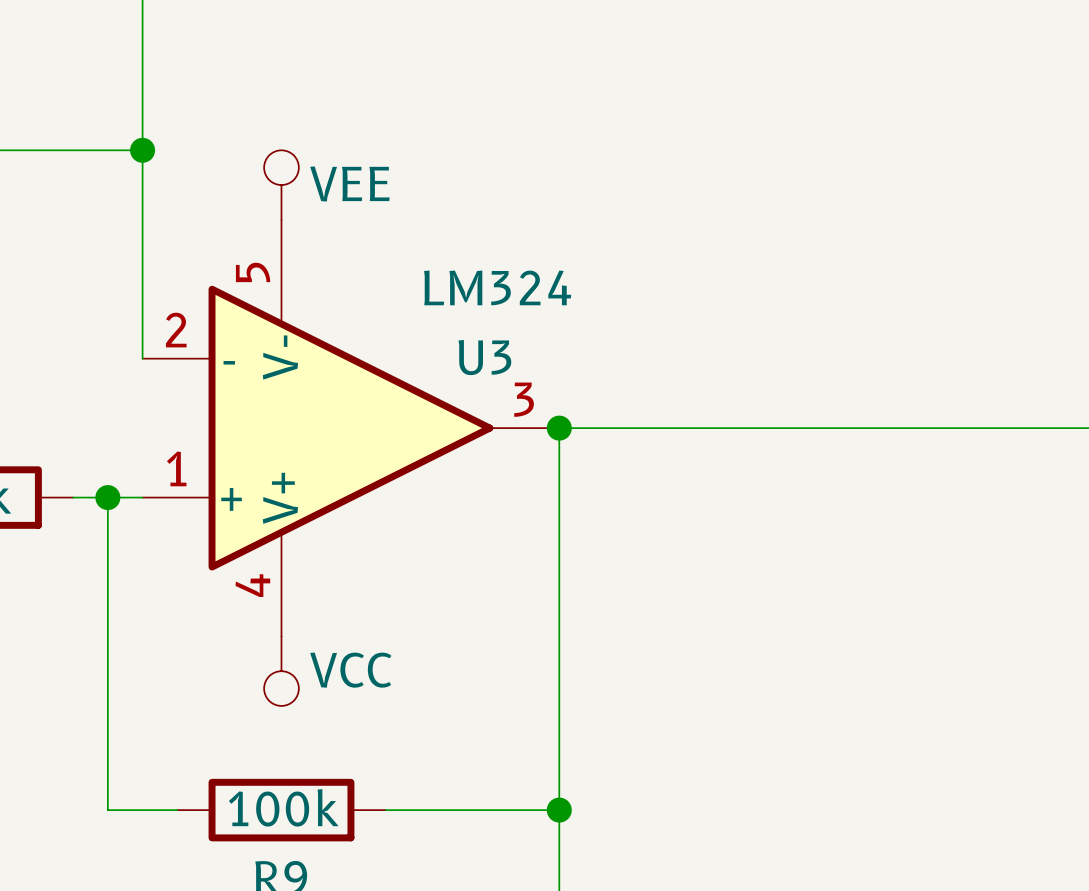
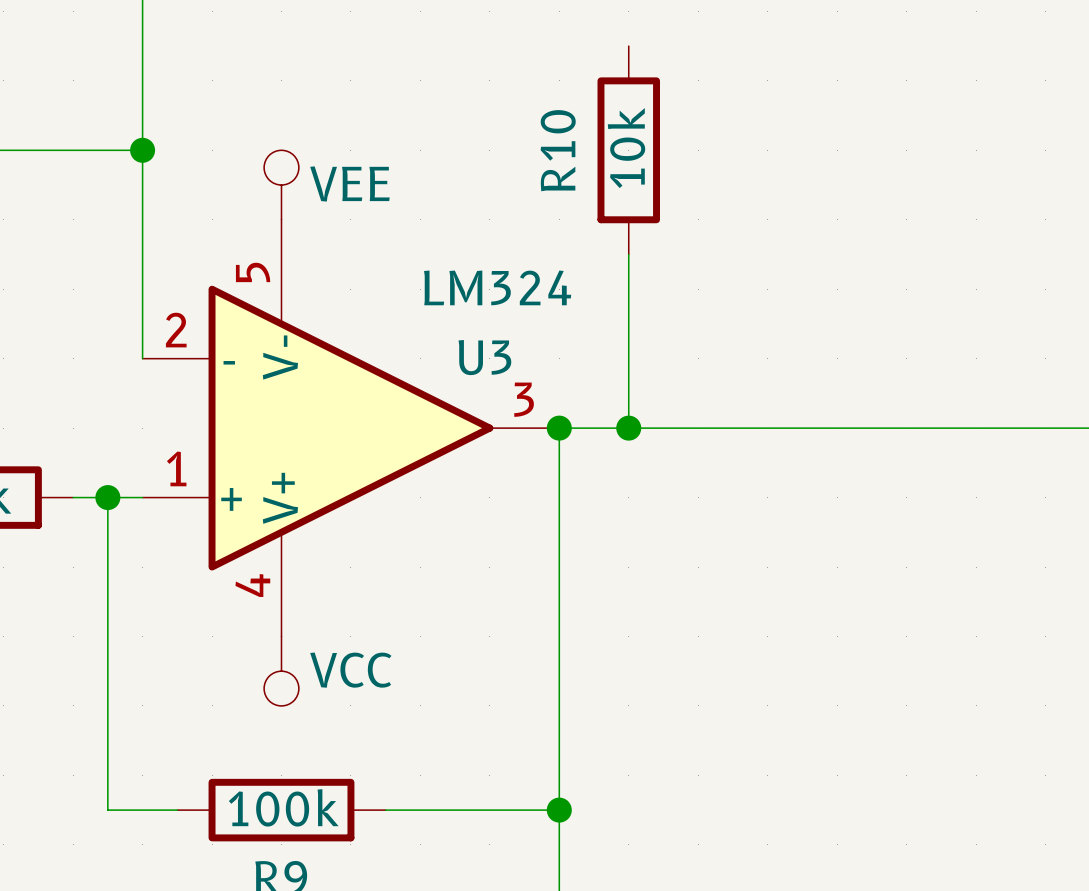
R10: none -> 10k (628, 150)
wire: none -> (628, 254) (628, 428)
junction: none -> (628, 428)

